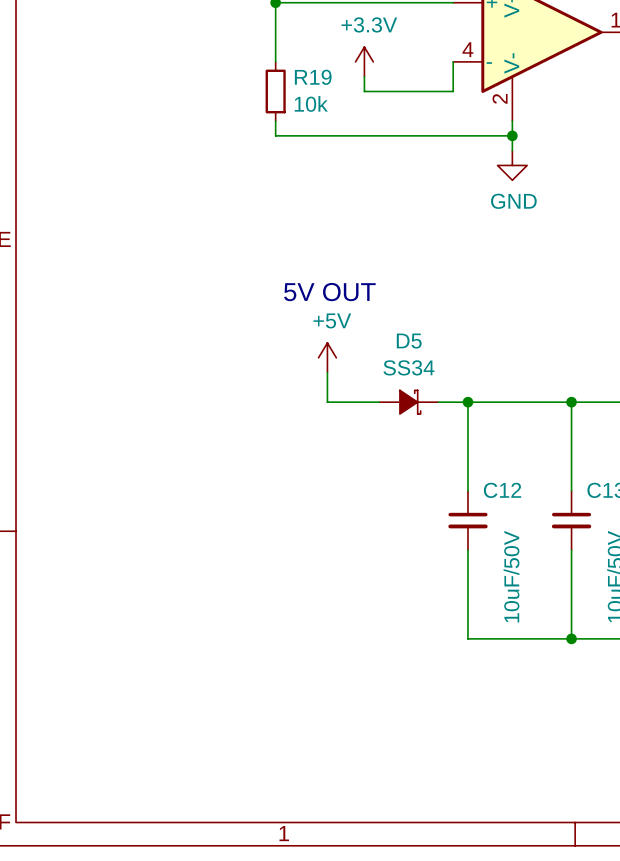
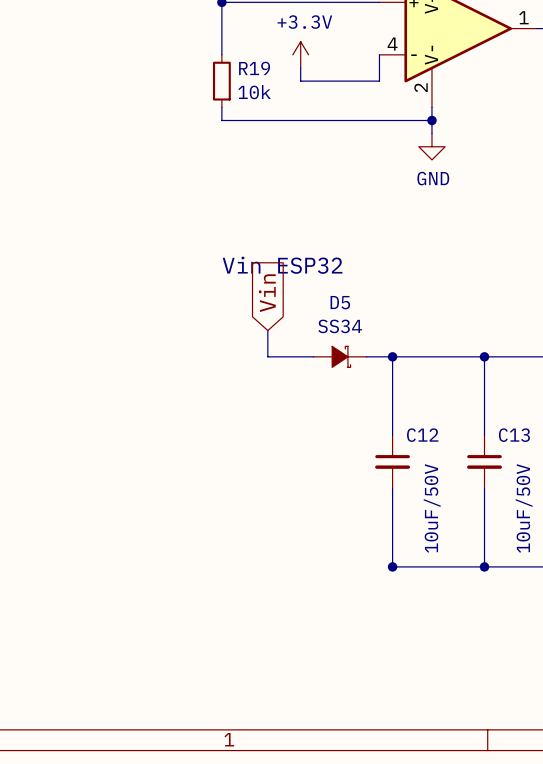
text: 5V OUT (329, 292) -> Vin ESP32 (282, 265)
global label: none -> Vin (267, 293)
power symbol: +5V (327, 357) -> none
junction: none -> (392, 566)

